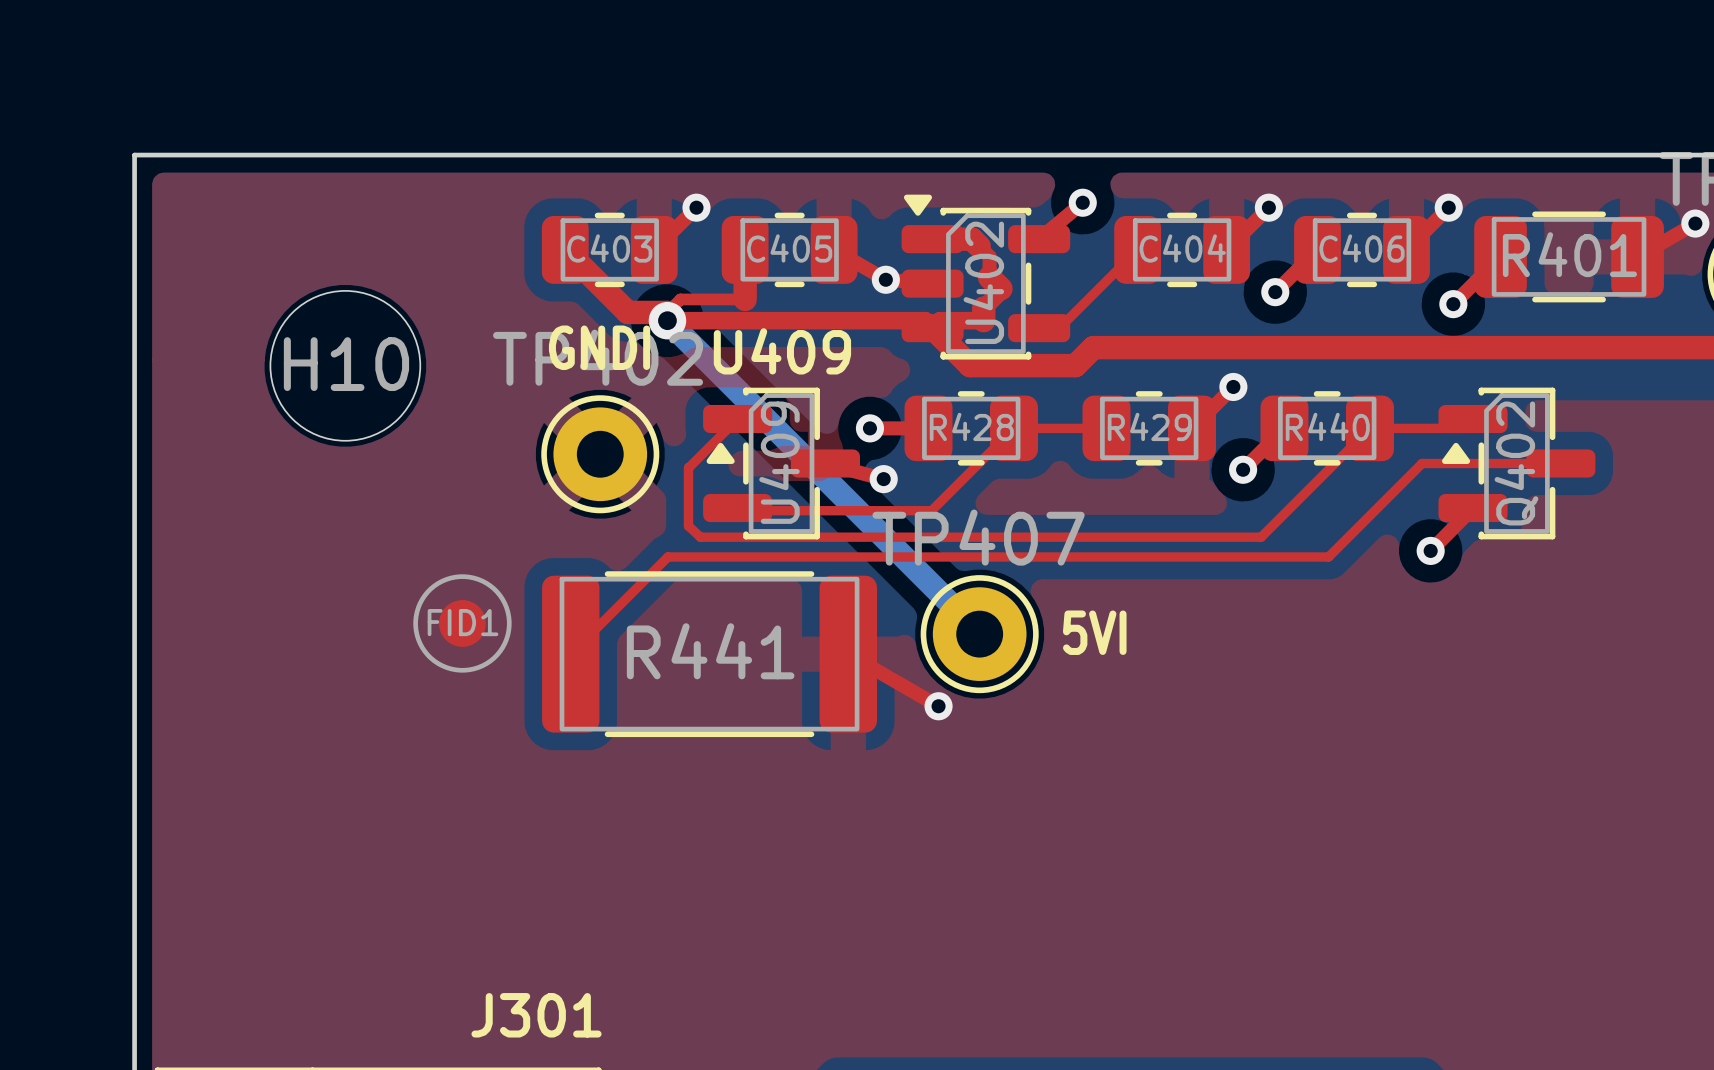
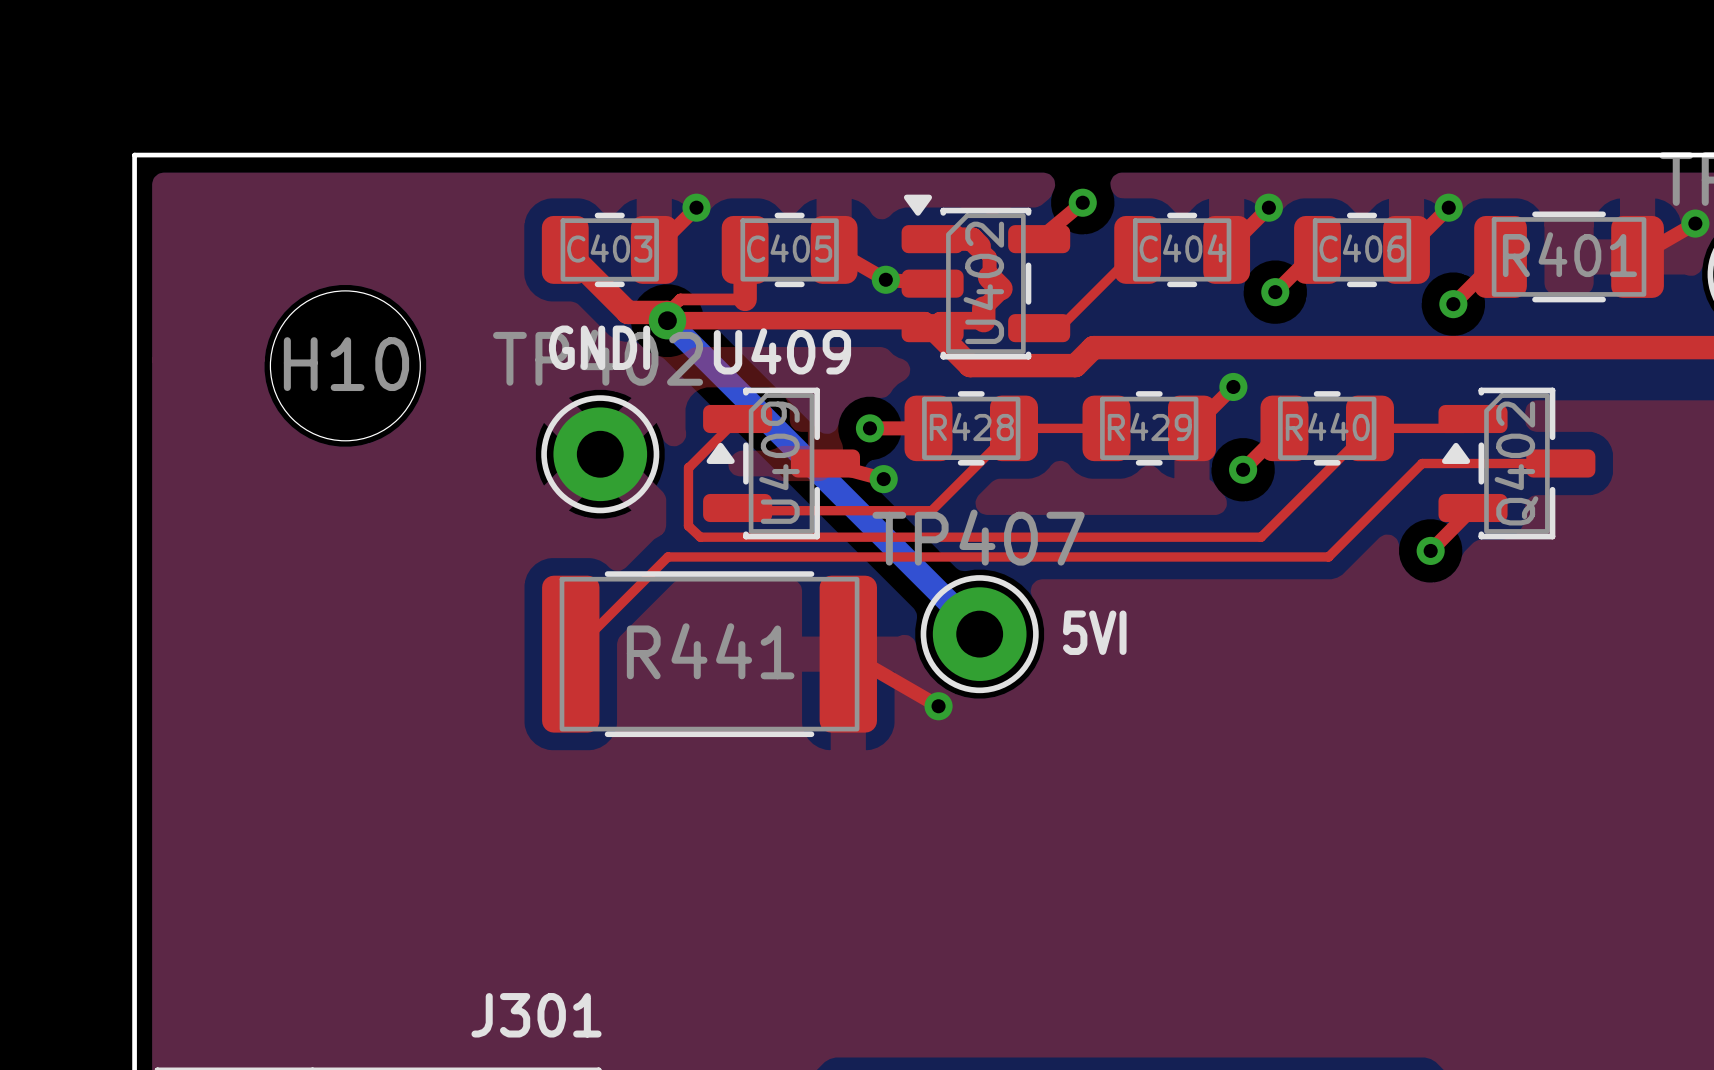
FID1: (462, 623) -> none

